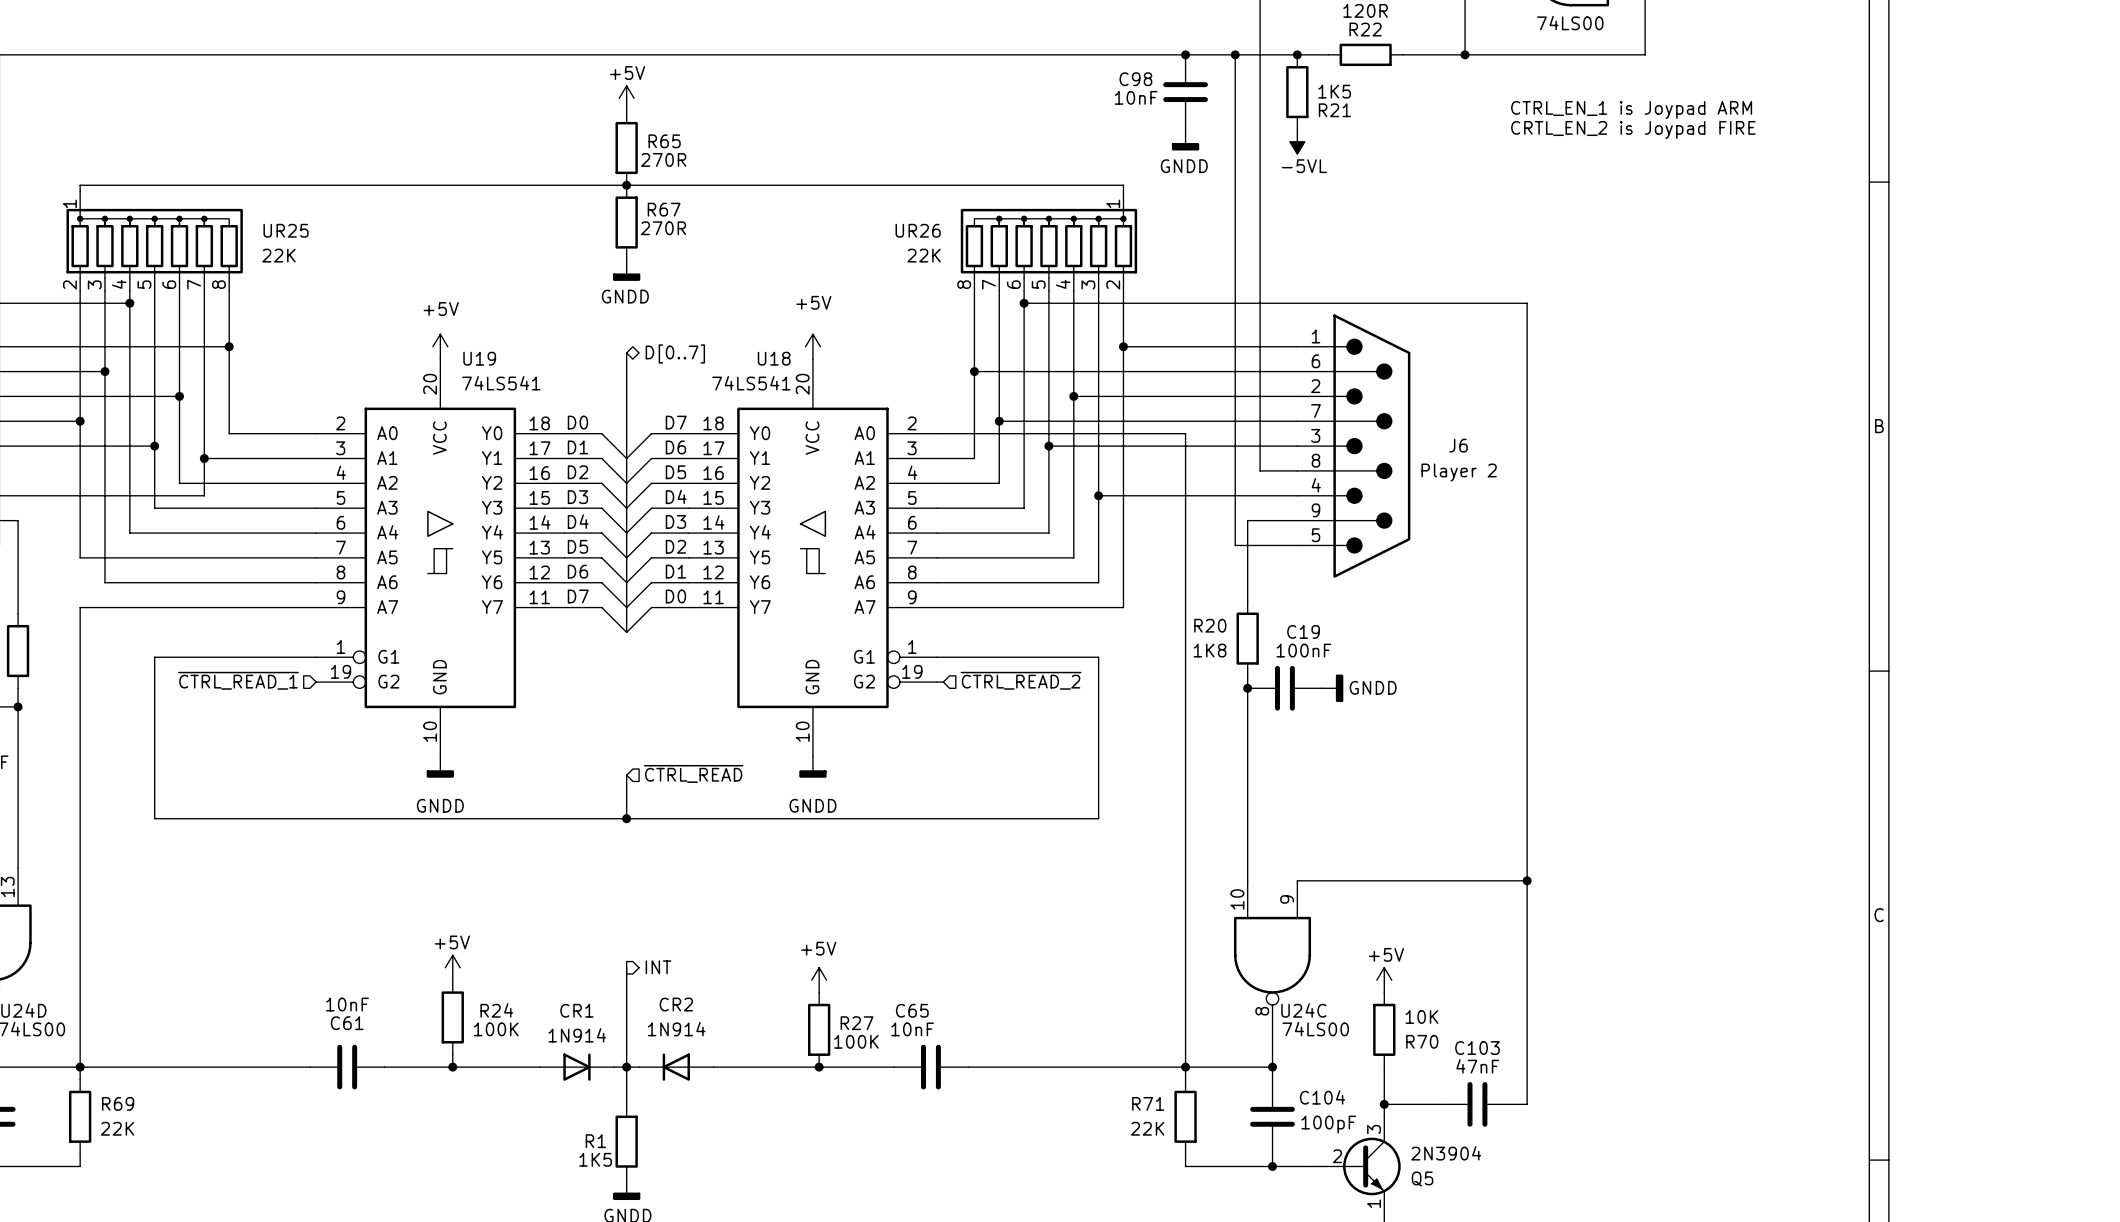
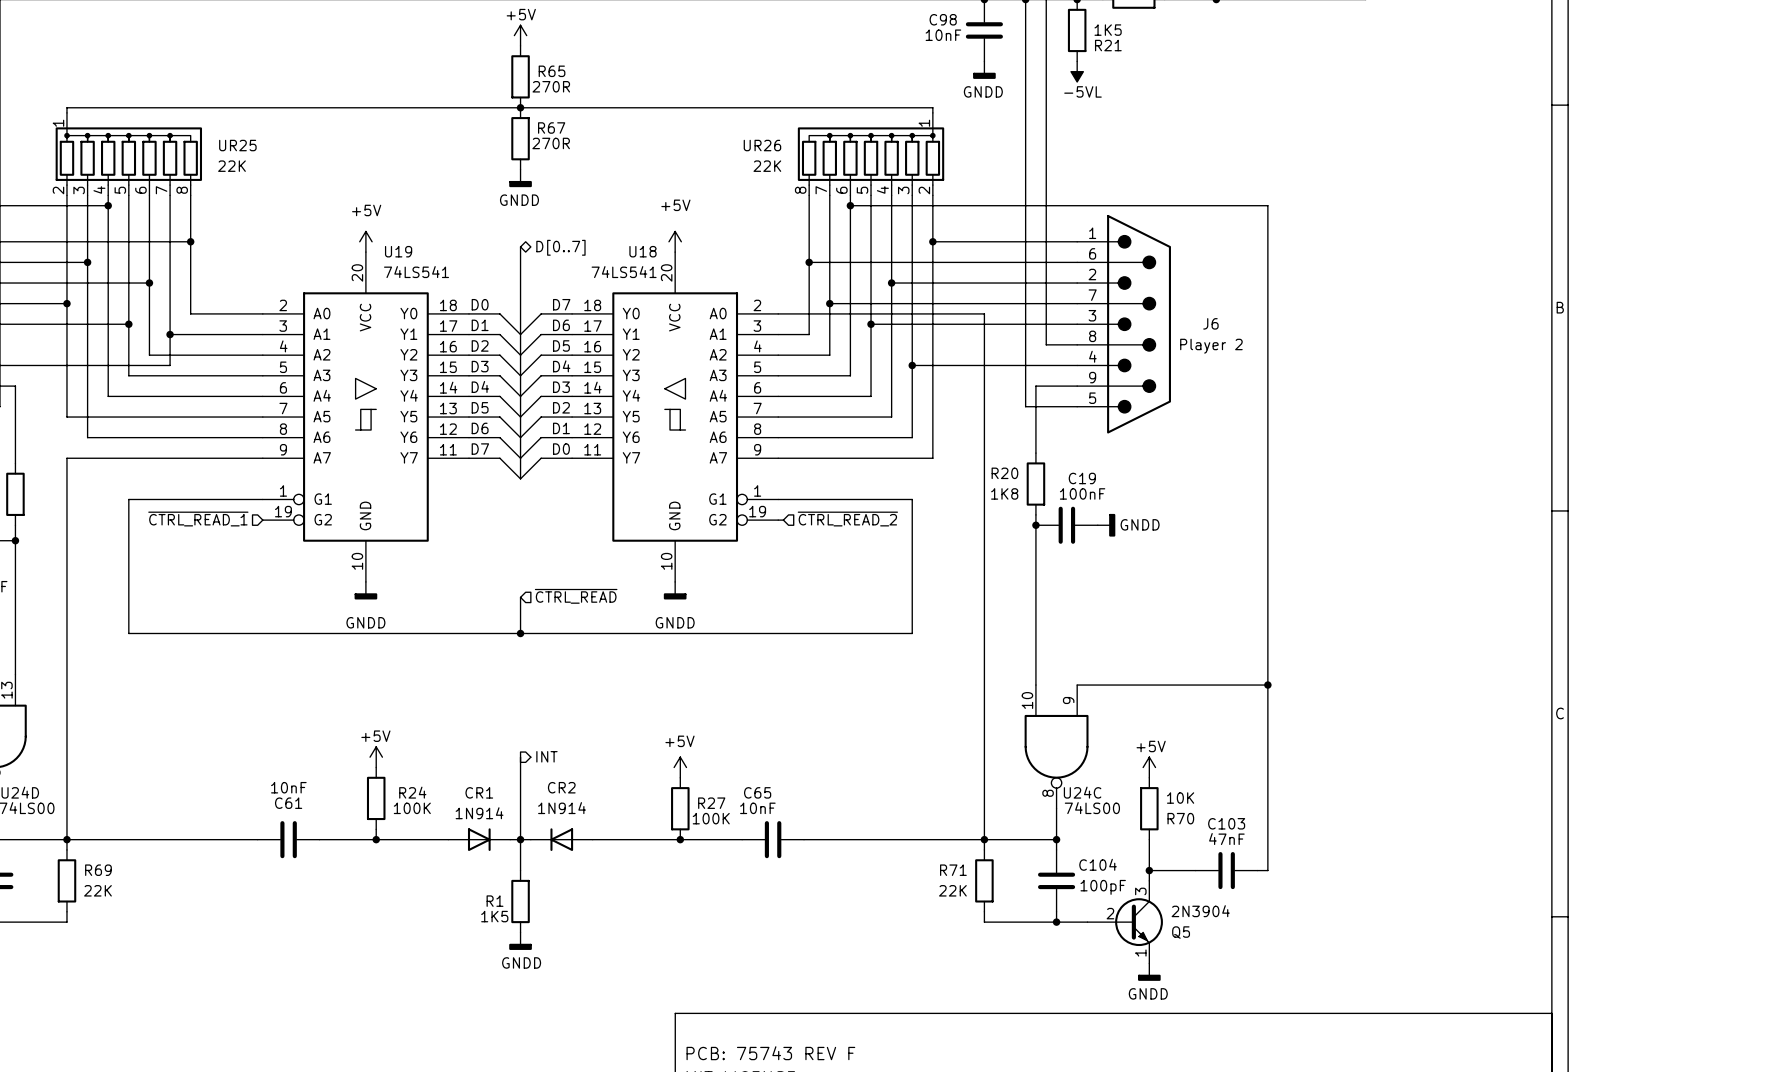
text: CTRL_EN_1 is Joypad ARM (1631, 109) -> none
text: CRTL_EN_2 is Joypad FIRE (1633, 129) -> none

